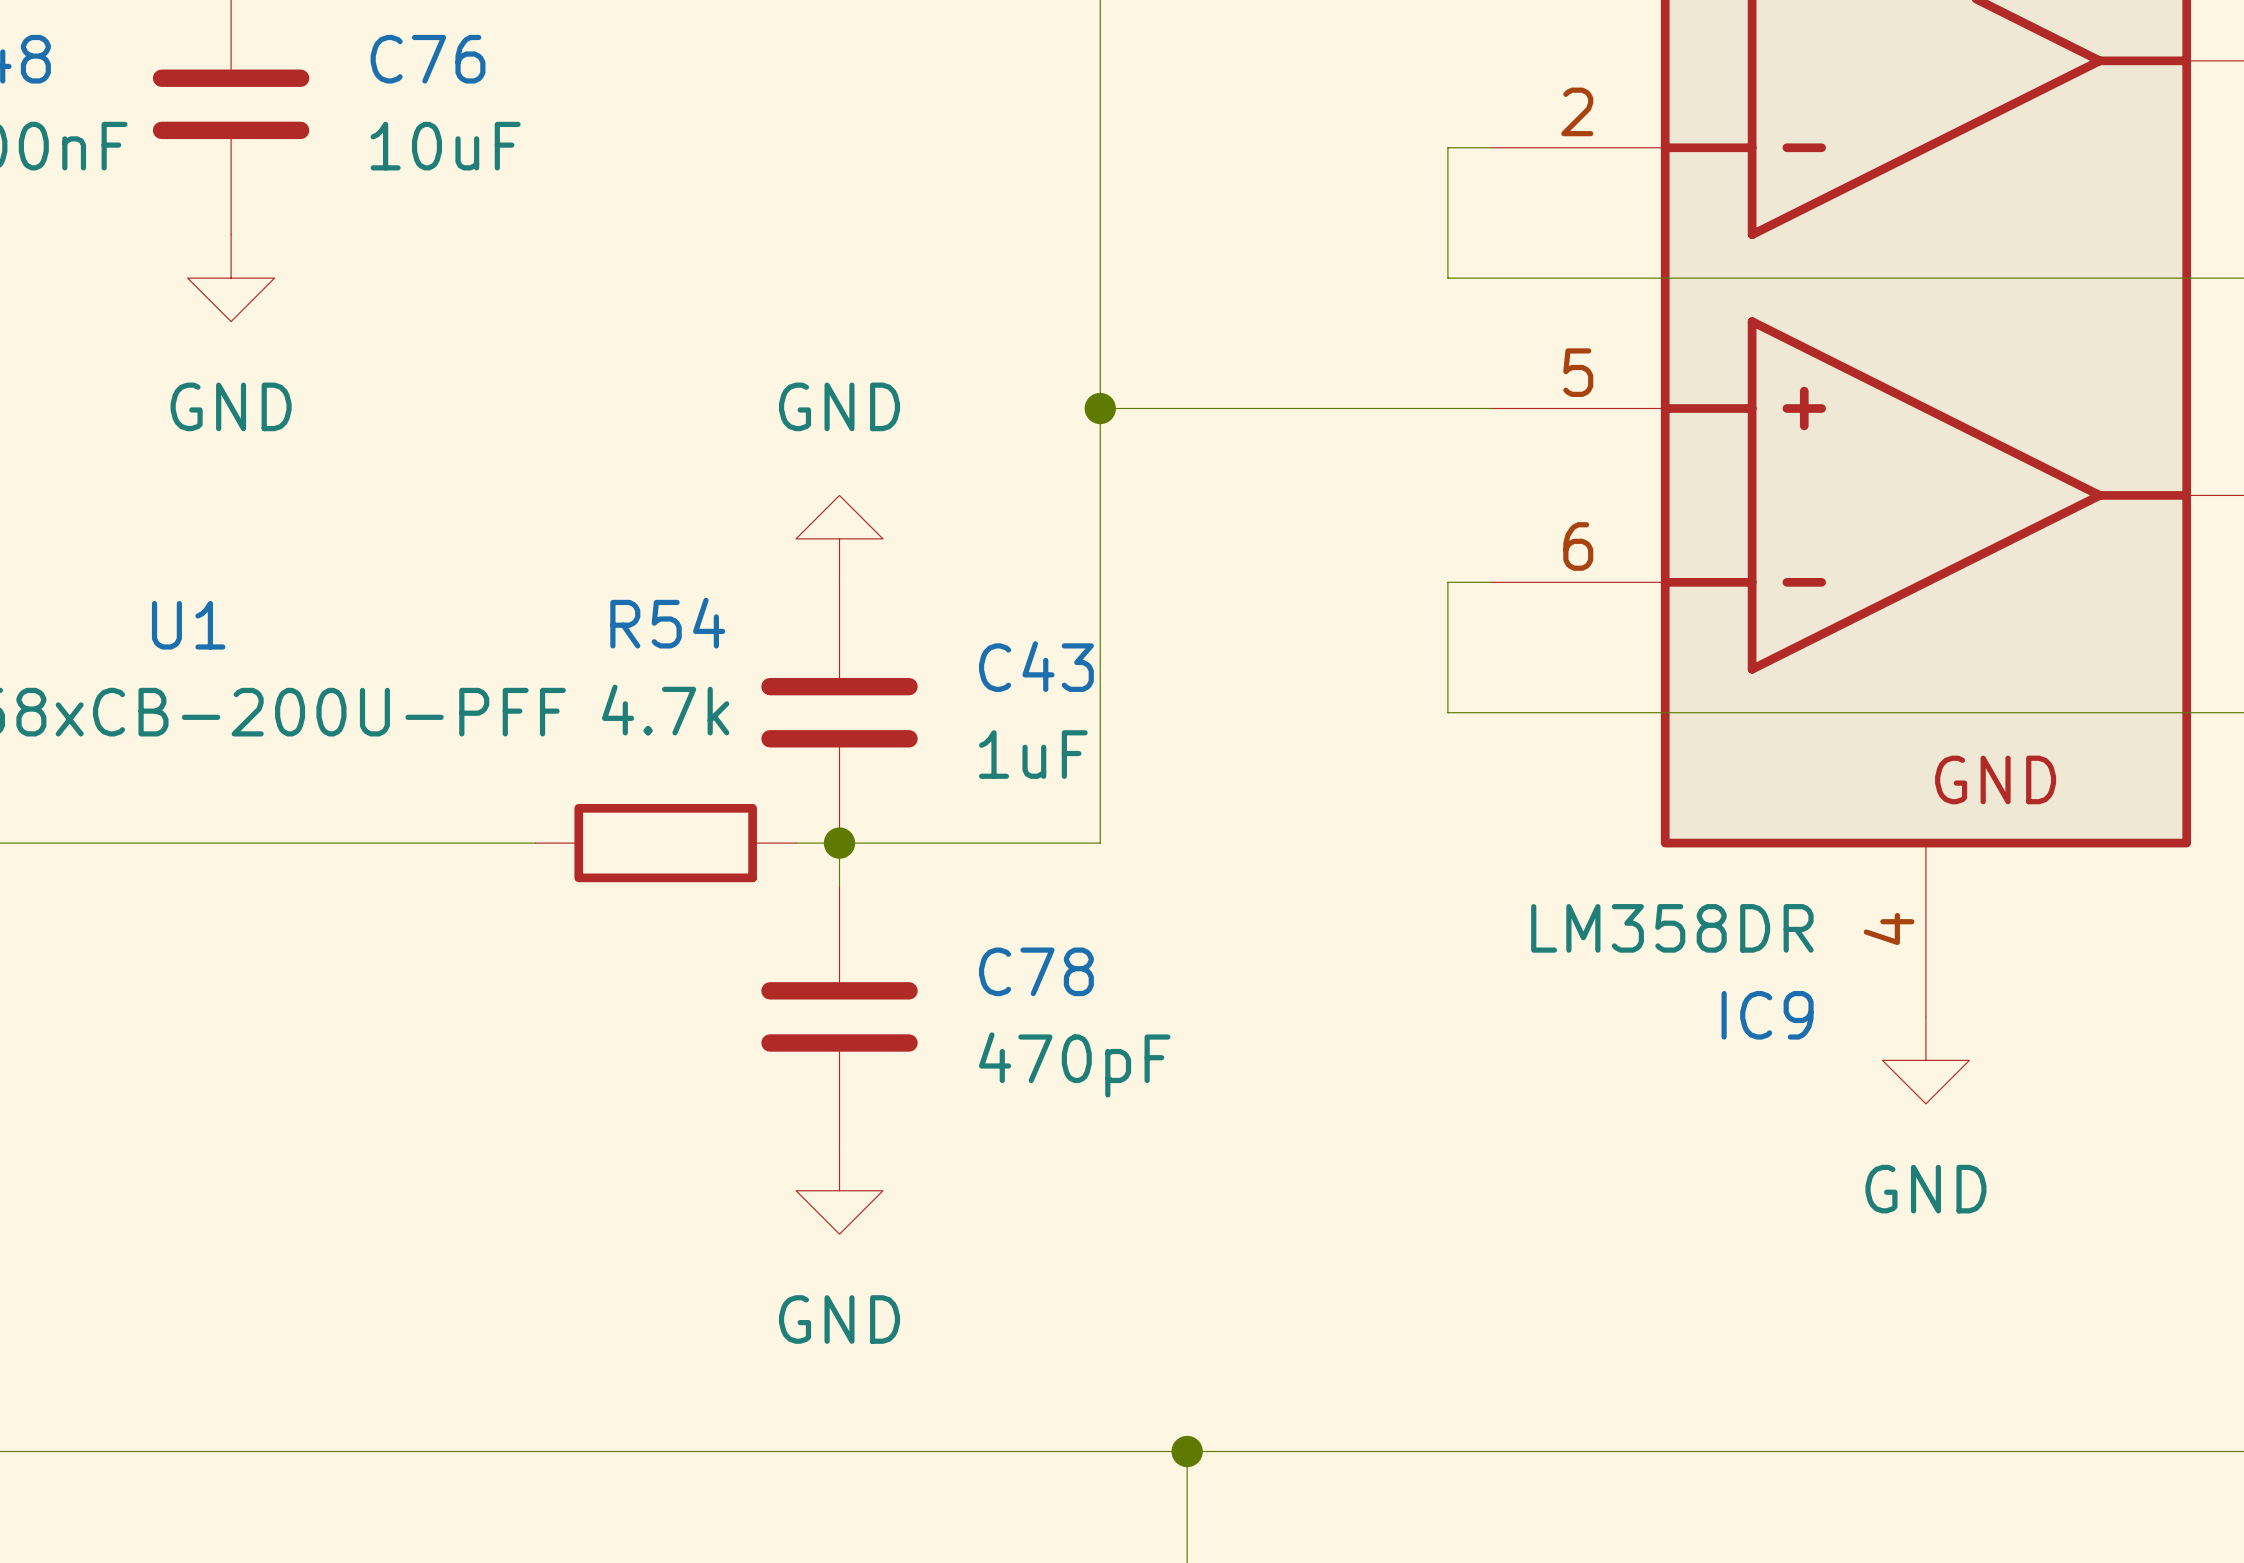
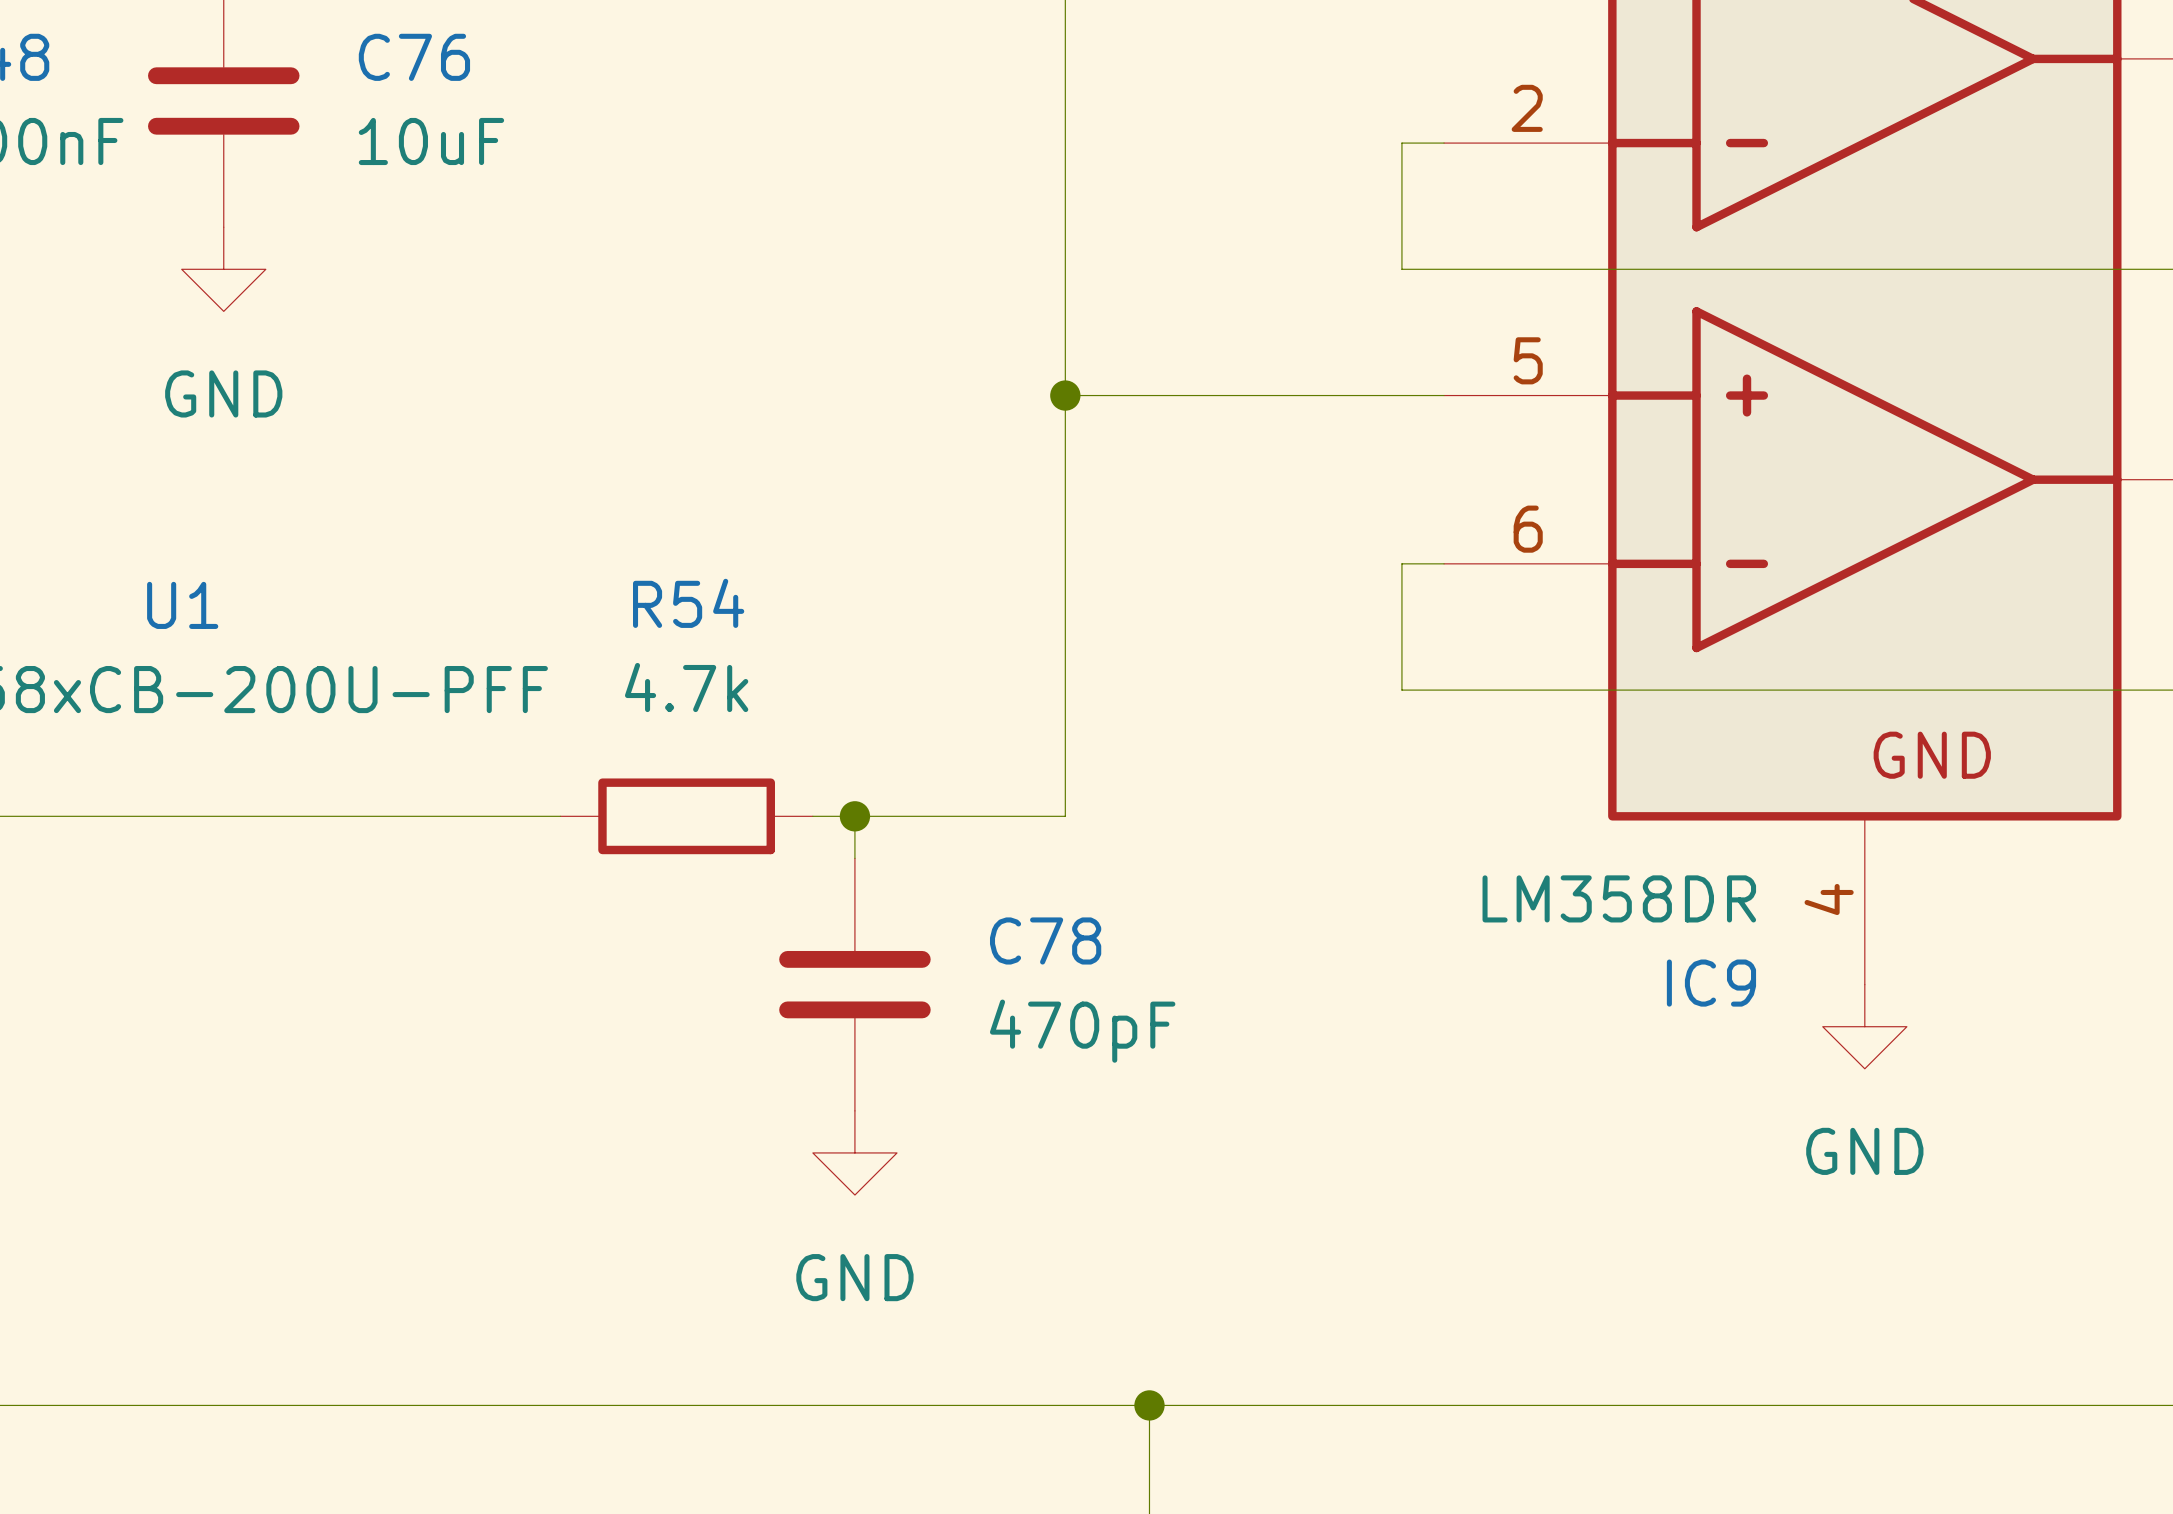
power symbol: GND (839, 538) -> none
C43: 1uF (839, 712) -> none
R54 position: (665, 843) -> (686, 816)
wire: (796, 843) (839, 843) (839, 886) -> none
junction position: (839, 843) -> (854, 816)
wire: none -> (854, 816) (854, 858)
C78 position: (839, 1016) -> (854, 984)
power symbol position: GND (839, 1190) -> GND (854, 1152)

